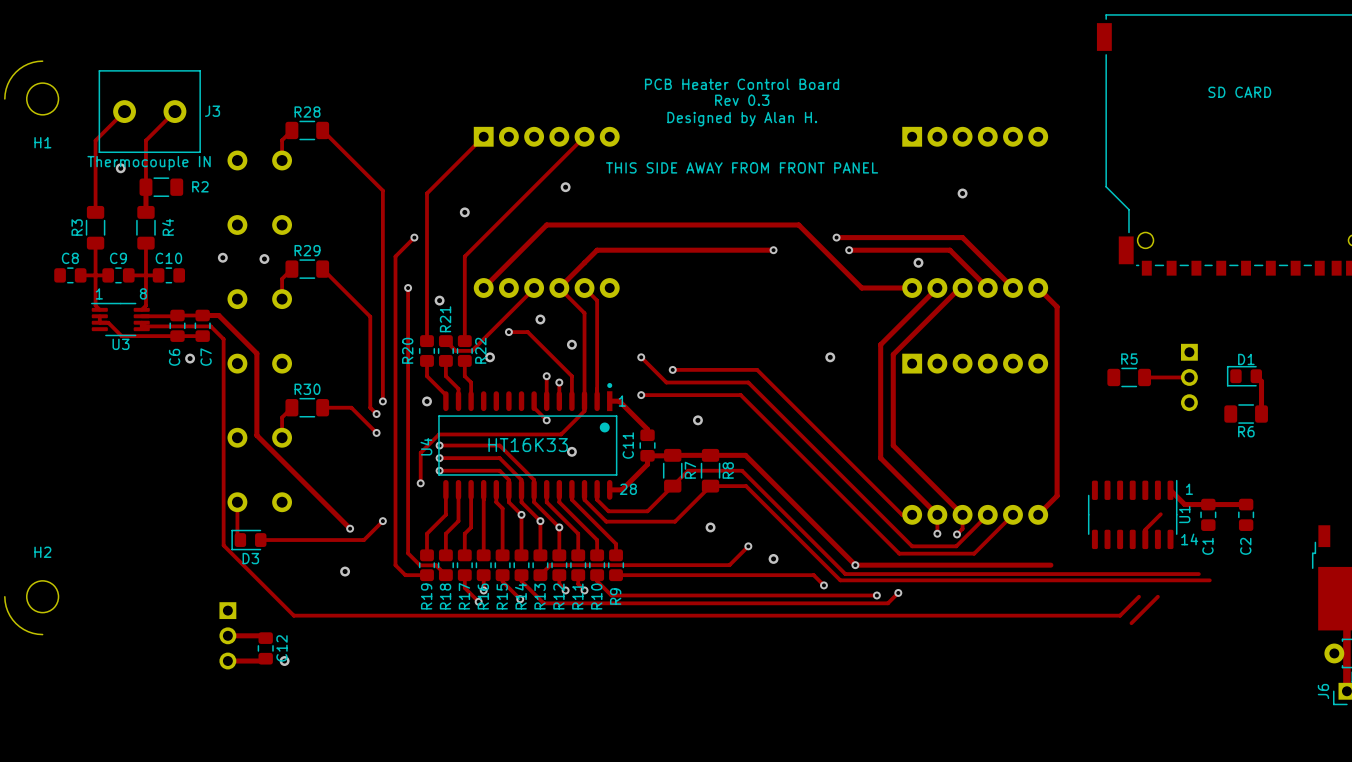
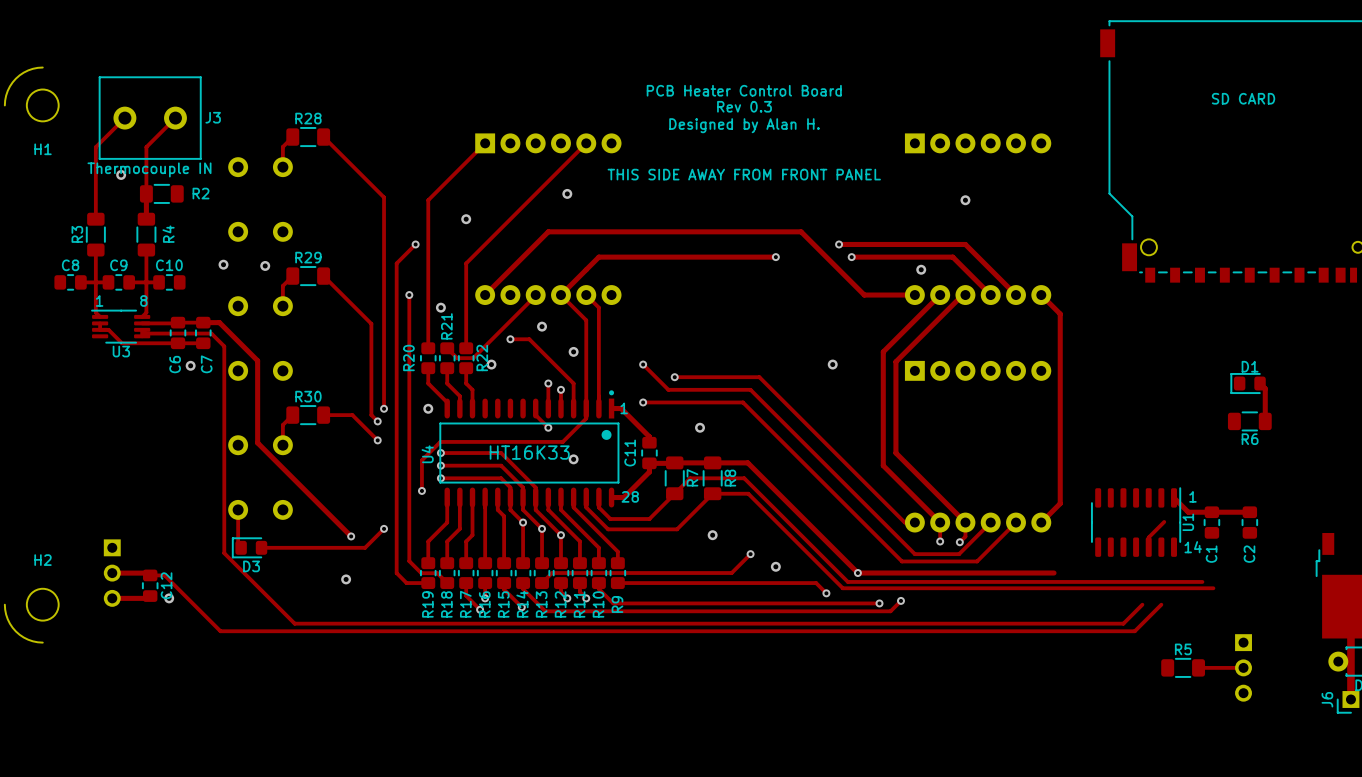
R5 position: (1129, 377) -> (1183, 667)
track: (1144, 377) (1189, 377) -> none
part: (1189, 377) -> none
track: none -> (112, 573) (147, 573) (150, 575) (164, 575) (220, 631) (1134, 631)
via: none -> (169, 598)
track: (227, 635) (263, 635) (265, 638) -> none
part position: (227, 635) -> (112, 573)
C12 position: (265, 648) -> (150, 585)
track: (265, 658) (263, 661) (227, 661) -> (150, 596) (147, 598) (112, 598)
track: none -> (1198, 667) (1243, 667)
part: none -> (1243, 667)
via: (284, 661) -> none

